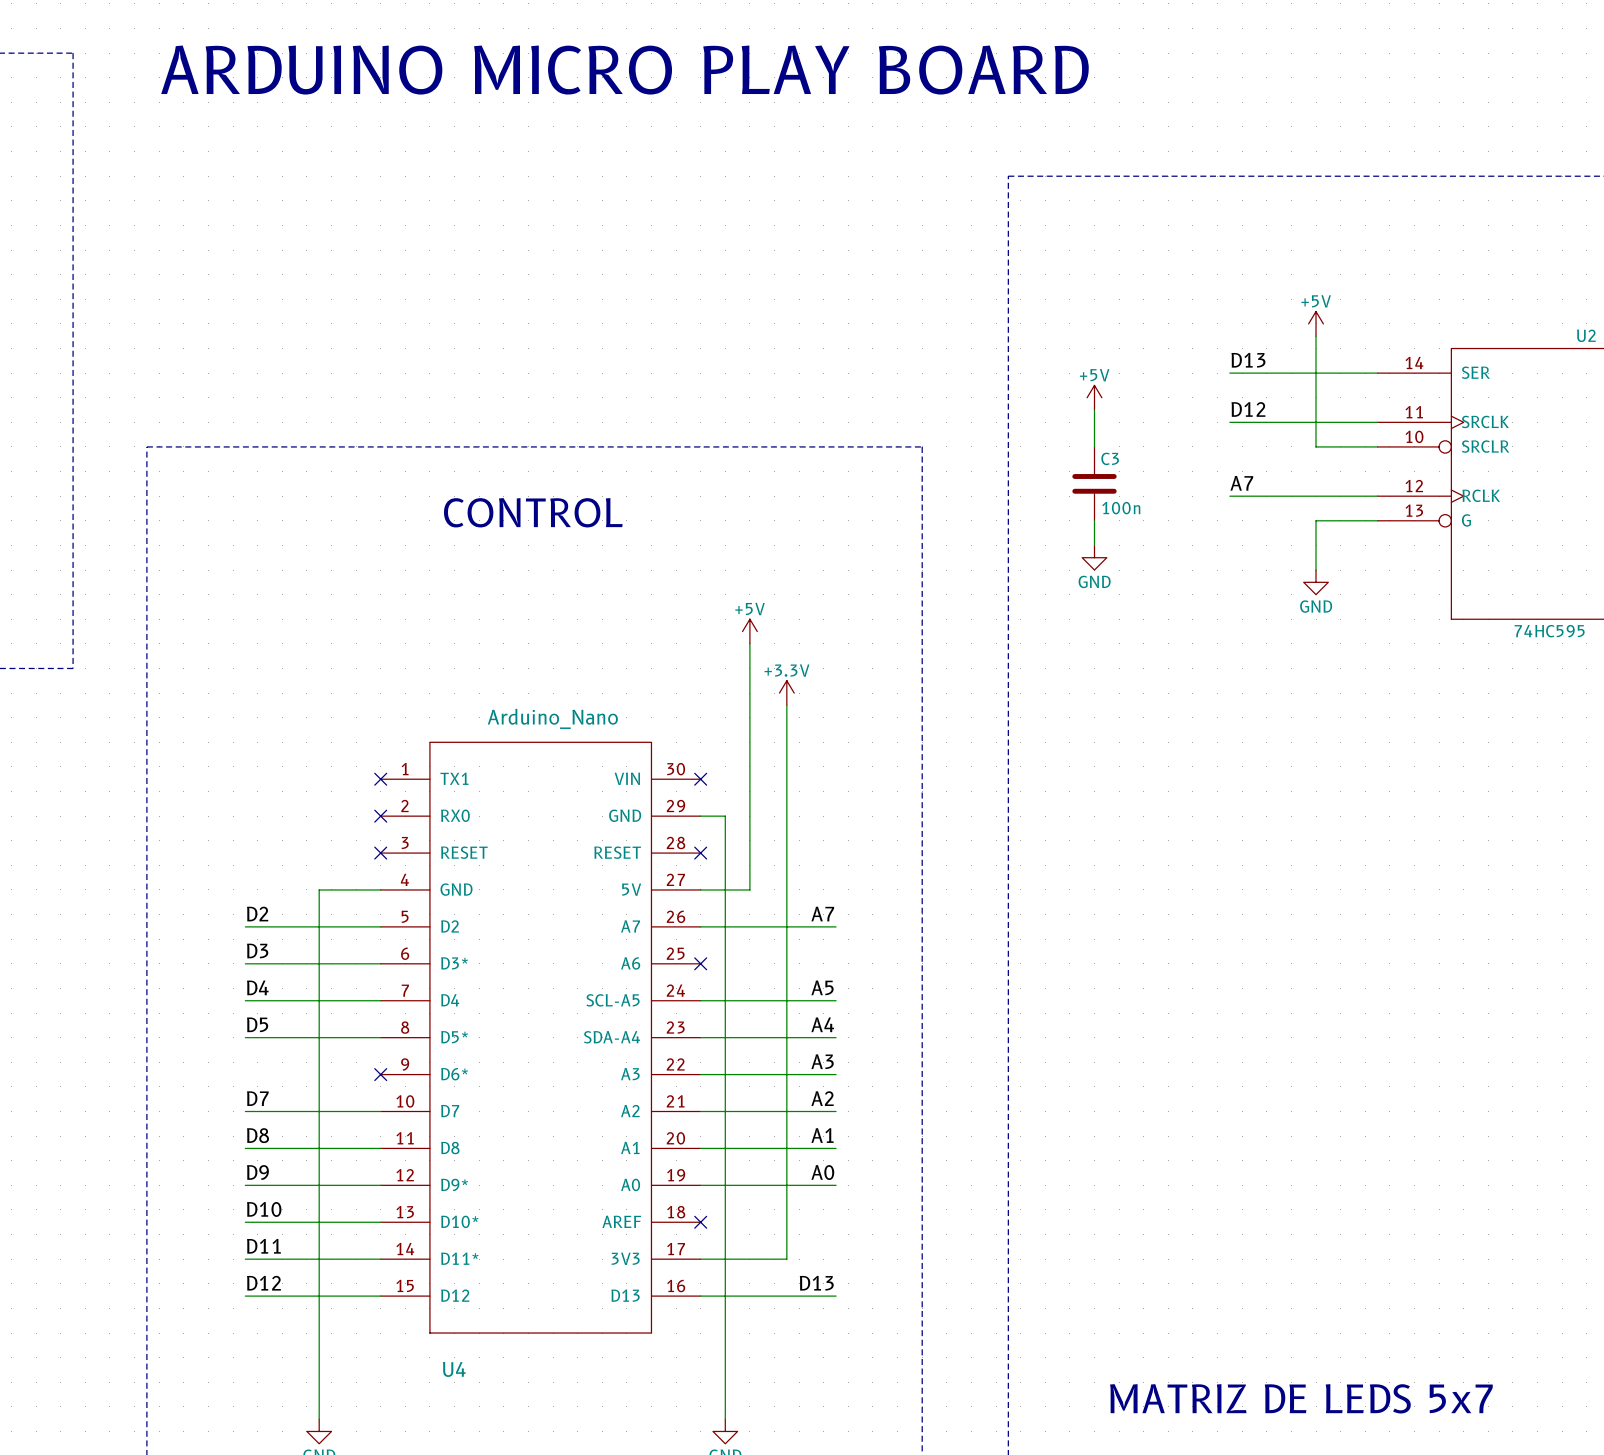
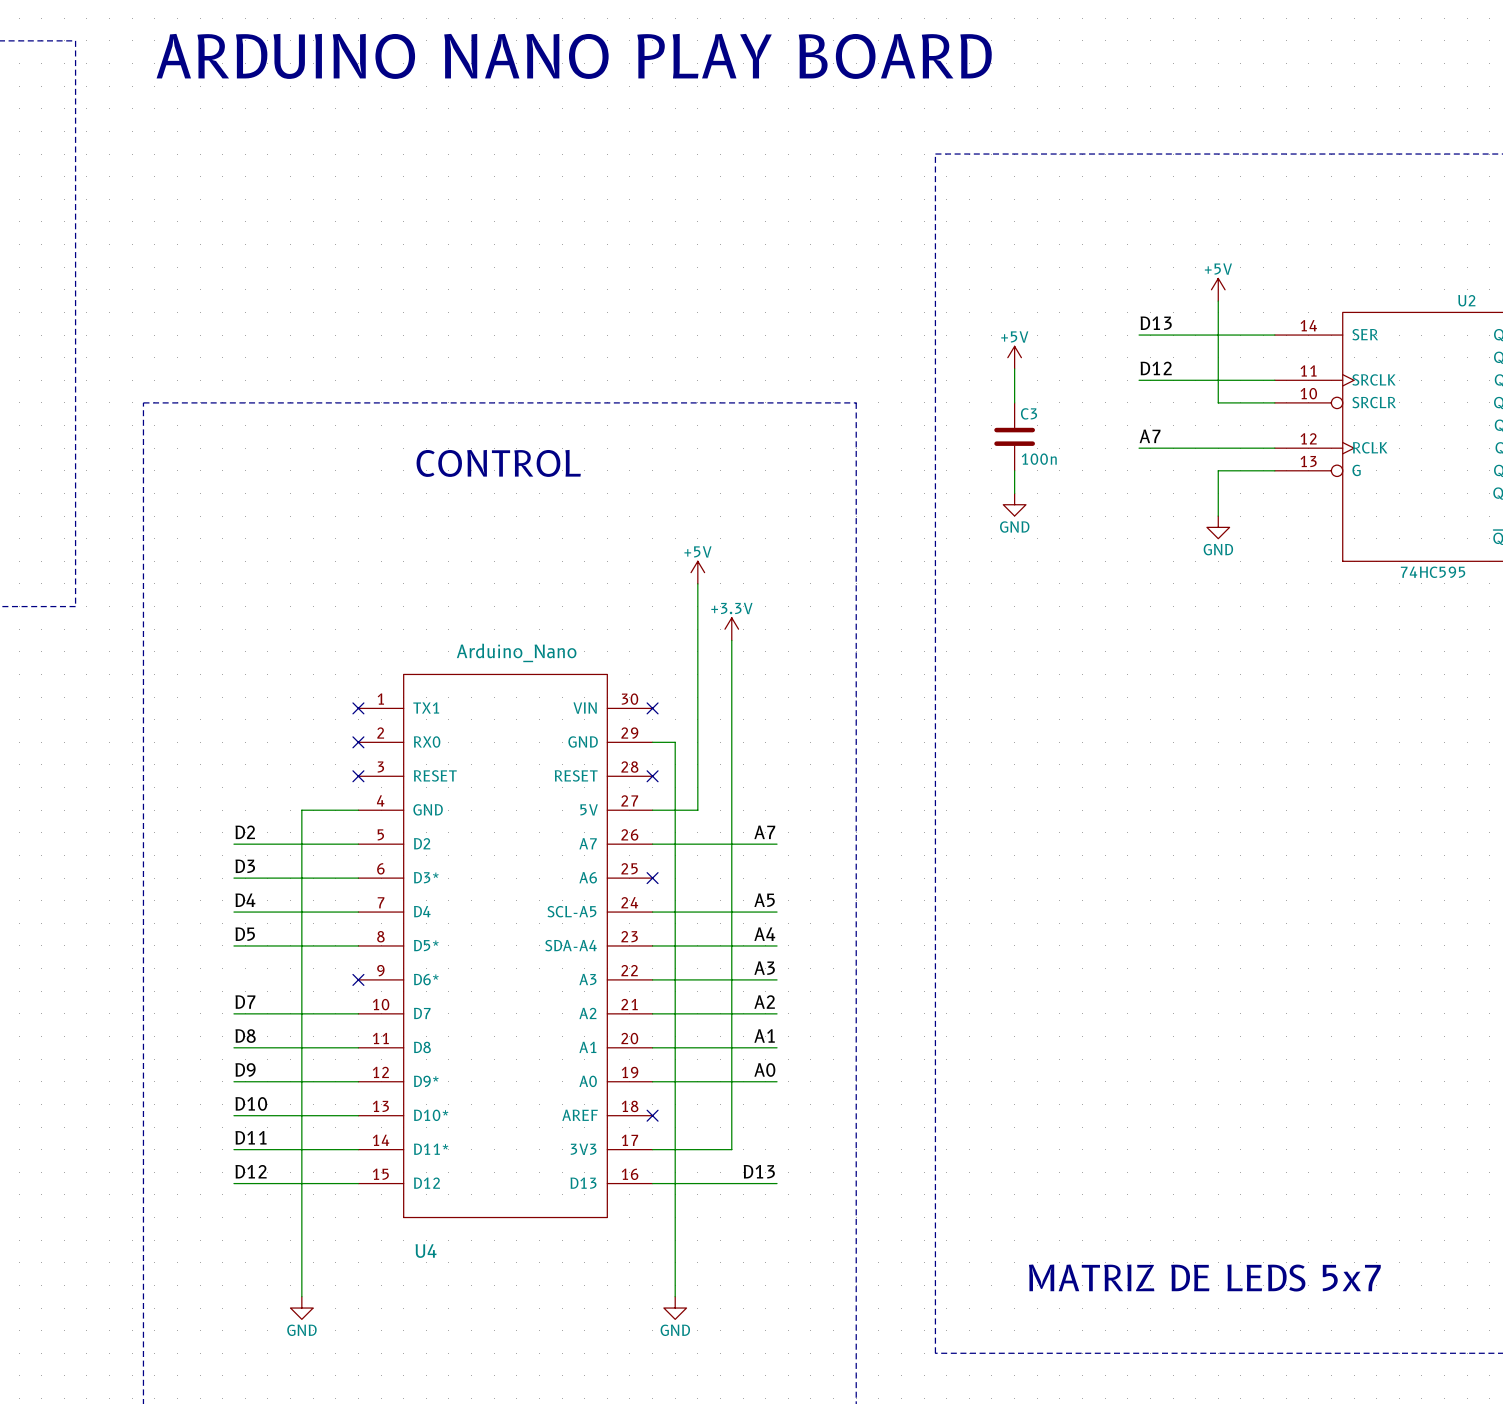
text: ARDUINO MICRO PLAY BOARD (624, 70) -> ARDUINO NANO PLAY BOARD (574, 56)

